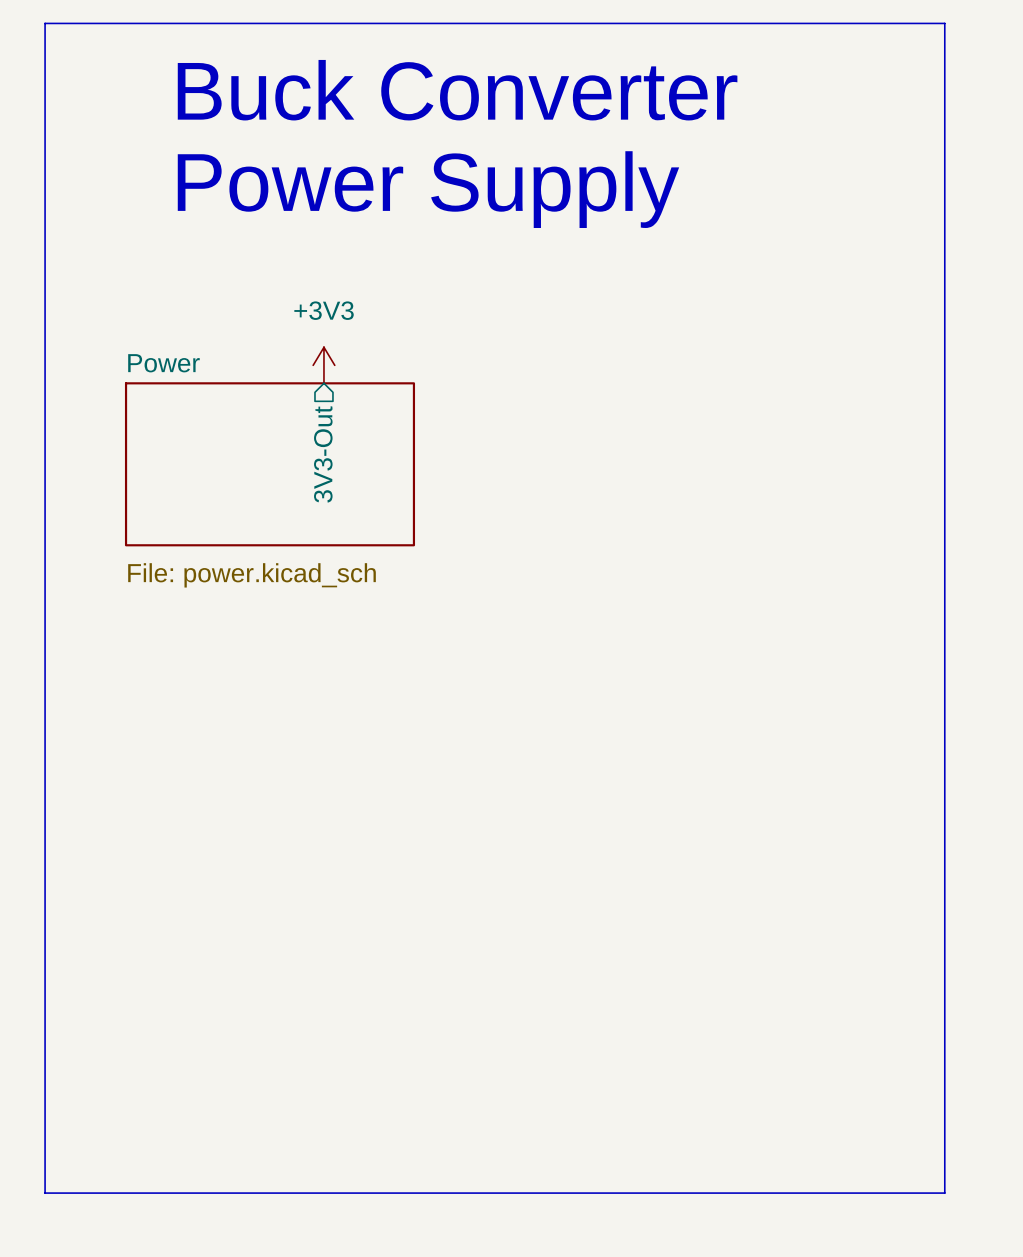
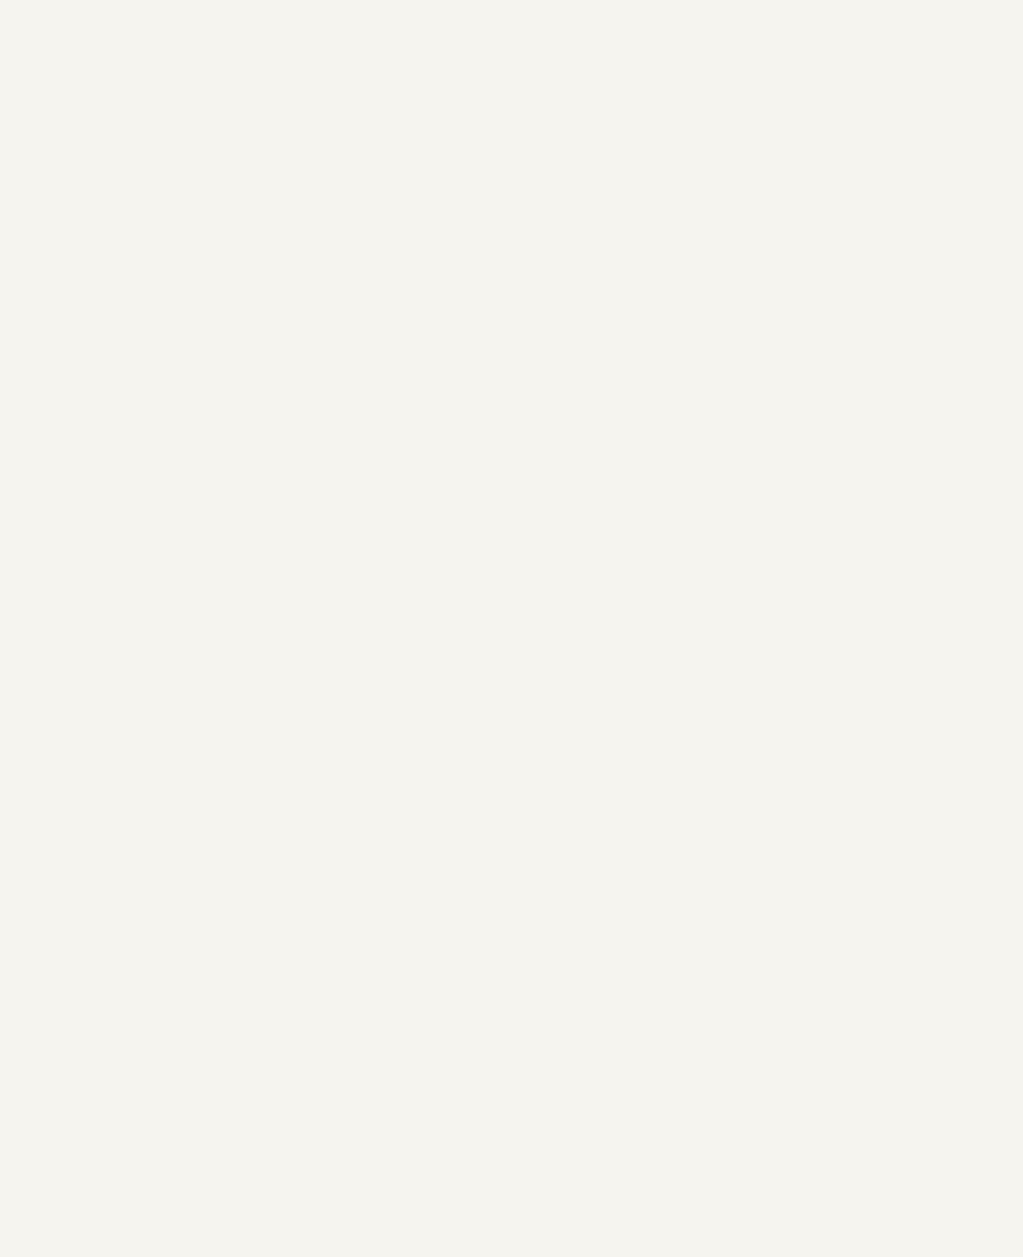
line: (45, 23) (944, 23) (944, 1193) (45, 1193) (45, 23) -> none
text: Buck Converter (457, 90) -> none
text: Power Supply (428, 189) -> none
power symbol: +3V3 (323, 365) -> none
sheet pin: 3V3-Out (323, 454) -> none
sheet Power: File: power.kicad_sch (269, 464) -> none

